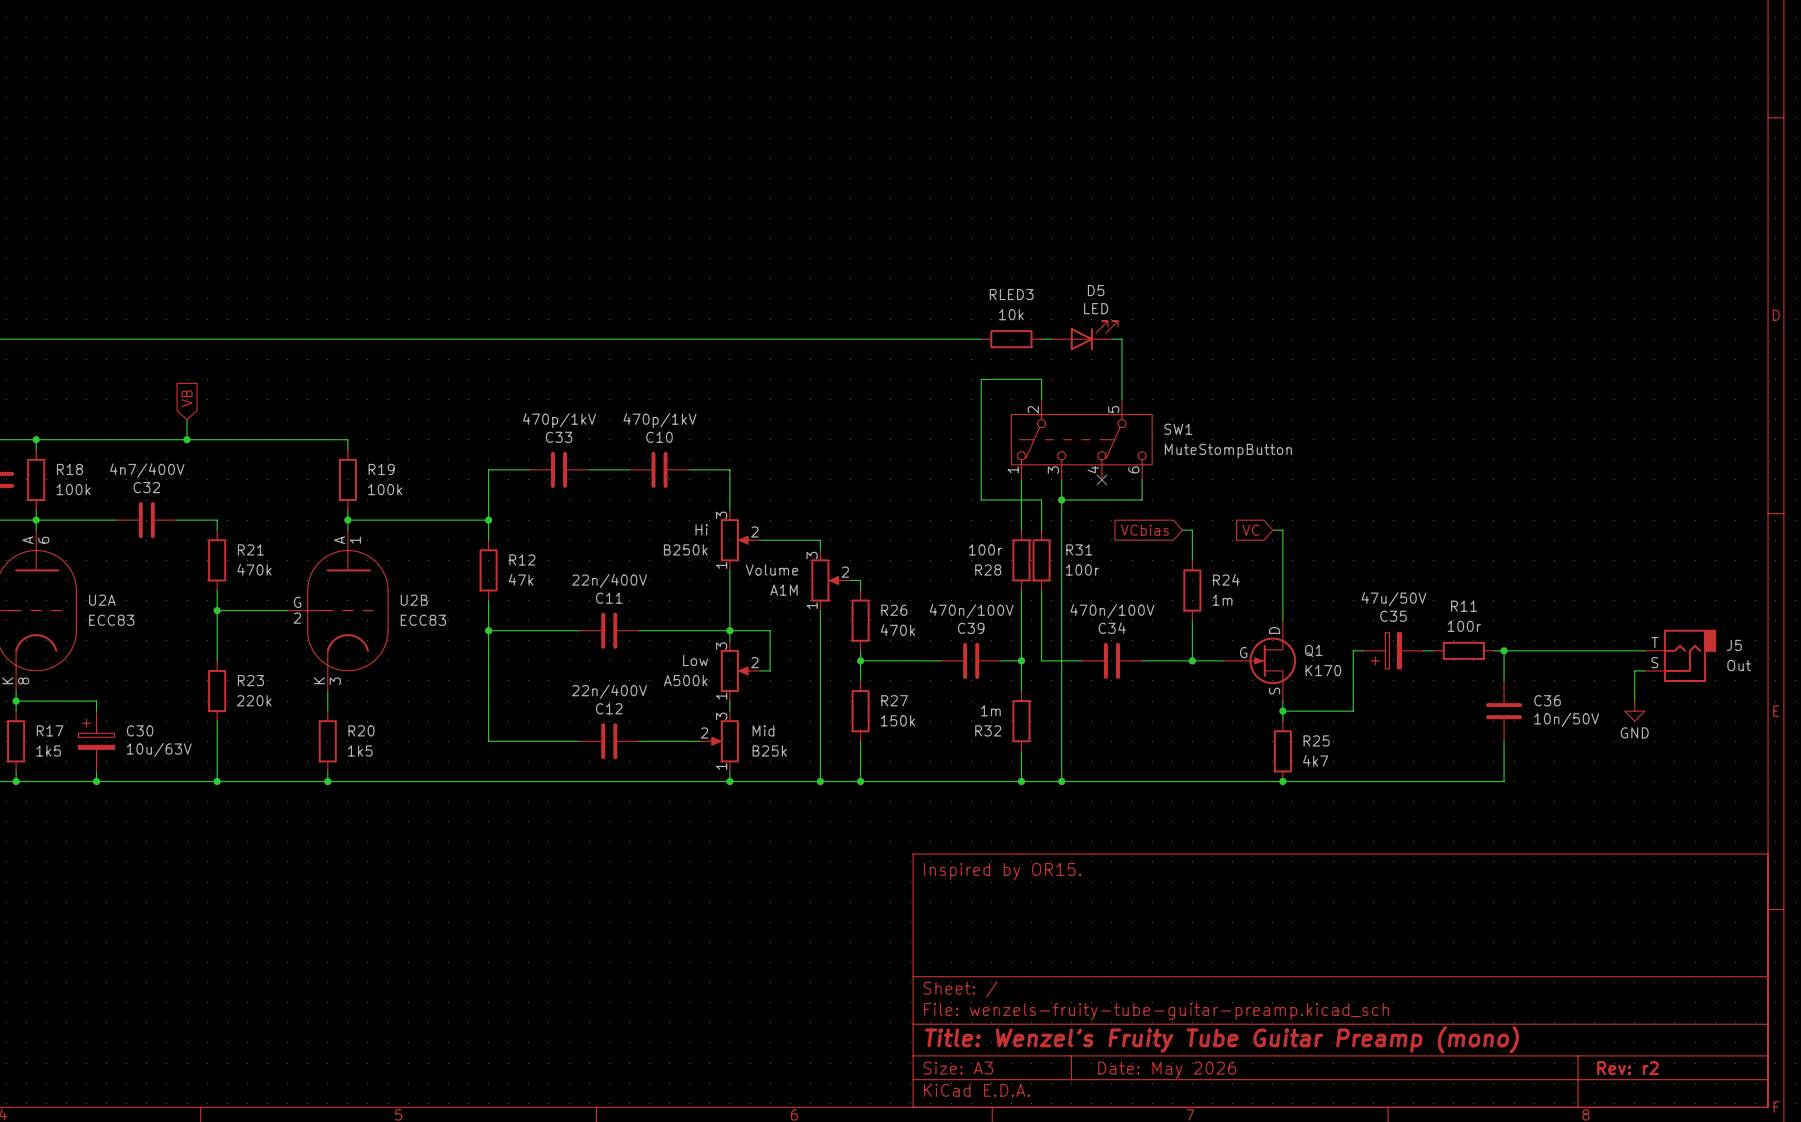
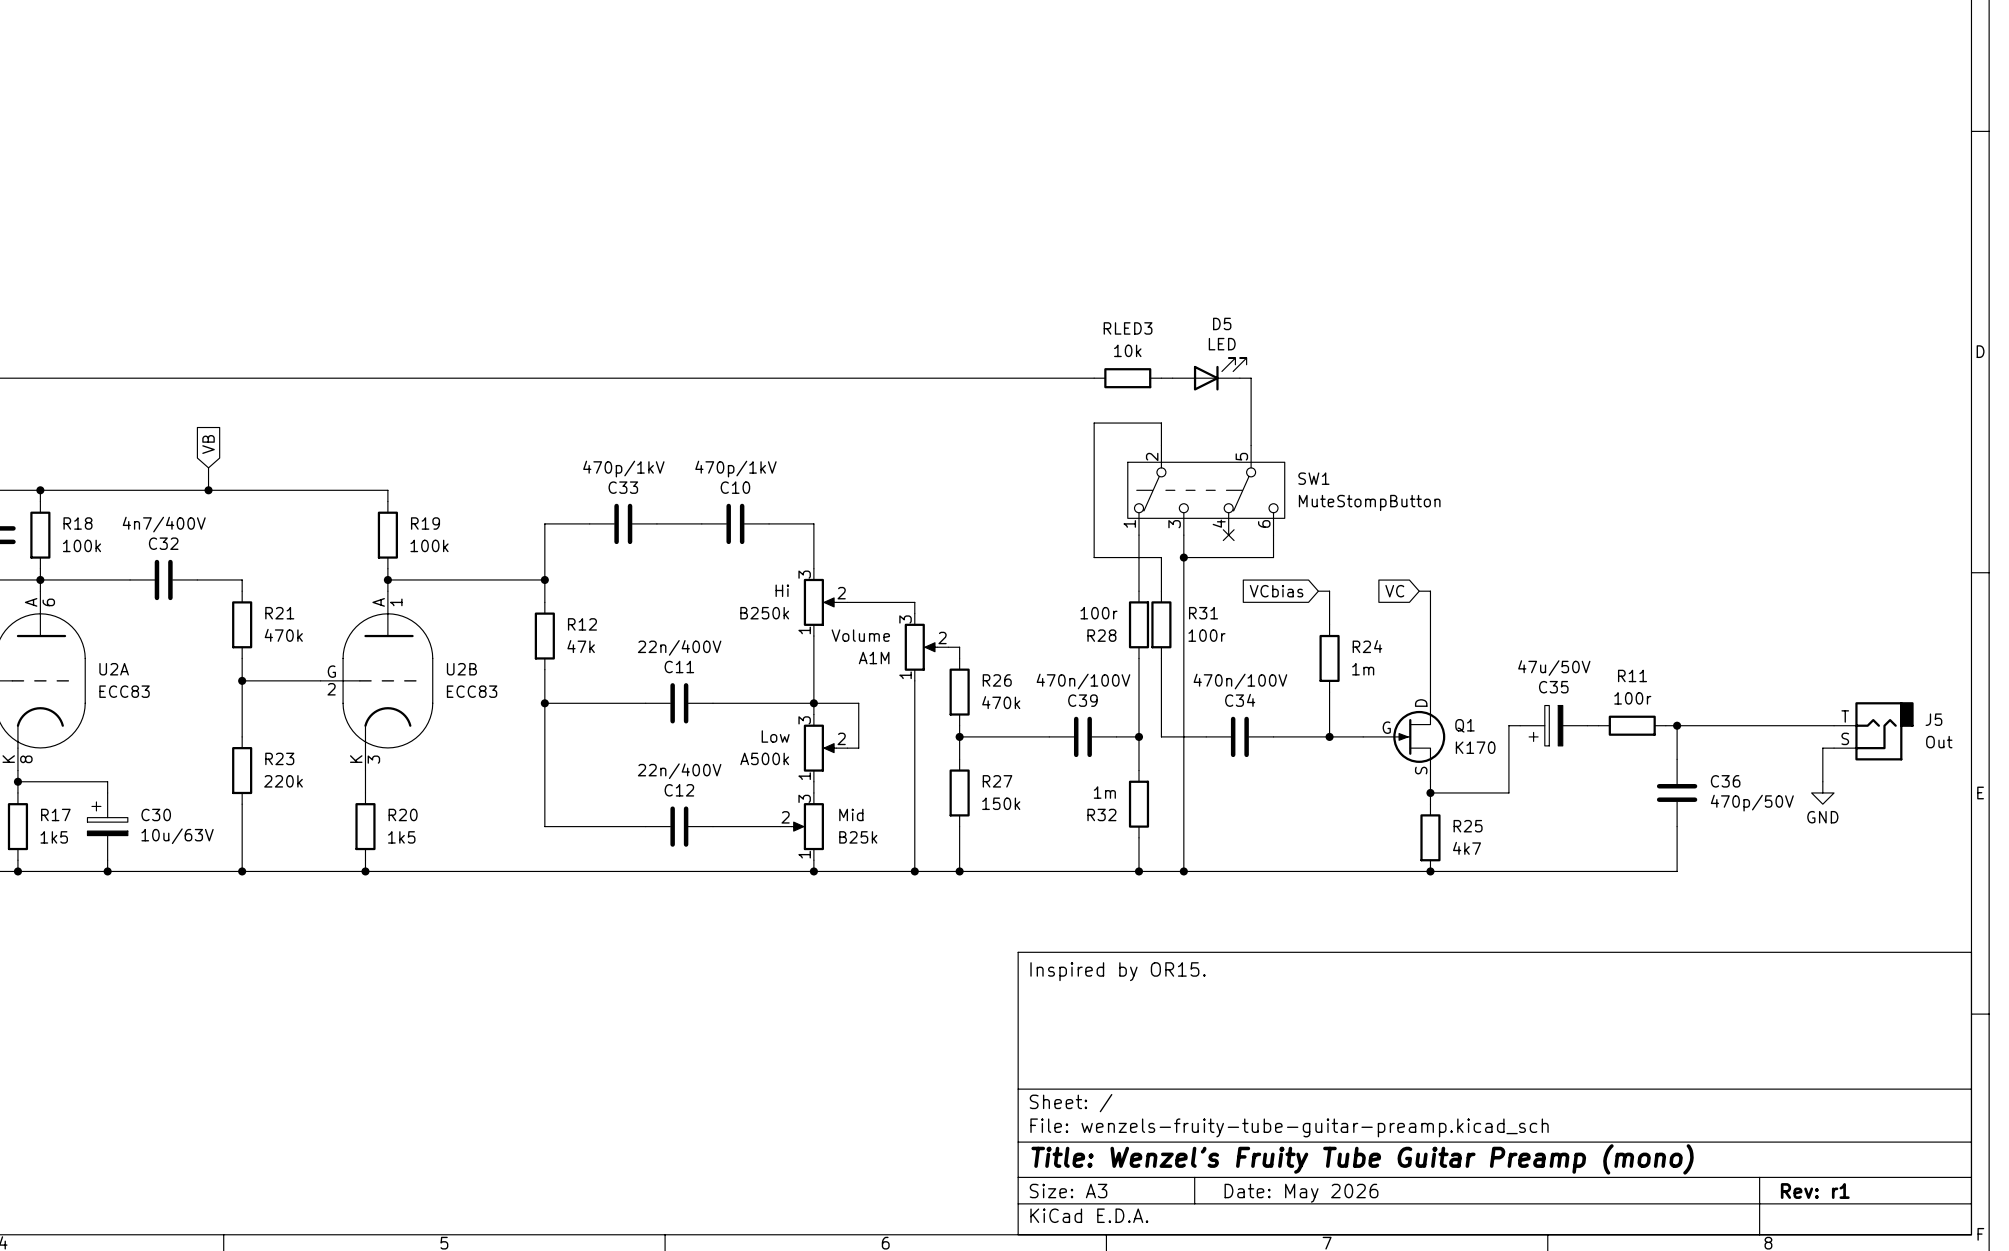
C36 value: 10n/50V (1566, 719) -> 470p/50V (1752, 803)
title block: Rev: r2 (1627, 1068) -> Rev: r1 (1815, 1191)

